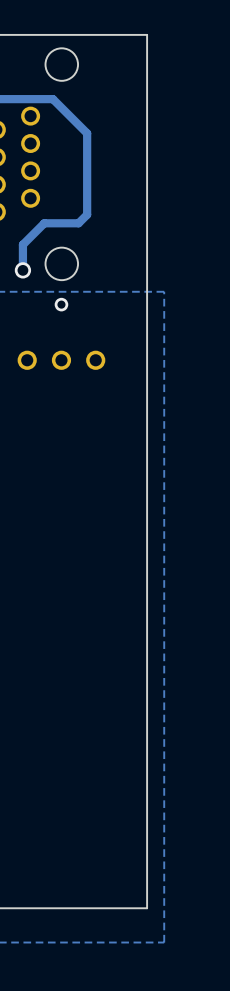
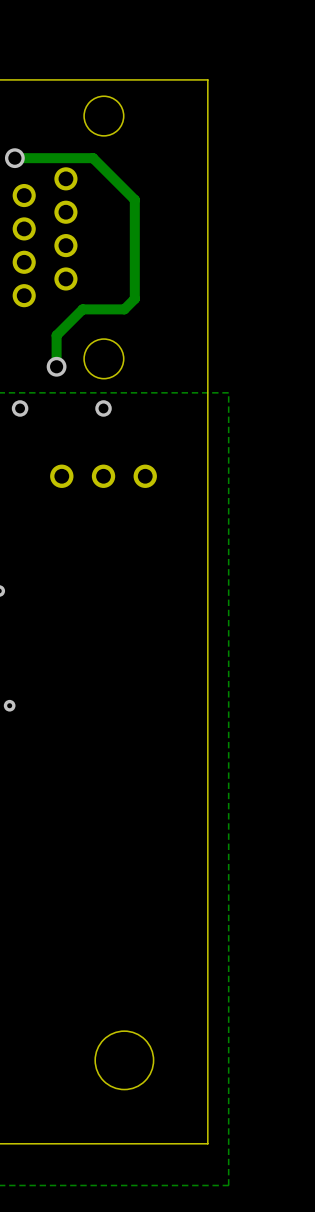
drawing: none -> [94, 1030, 154, 1090]

